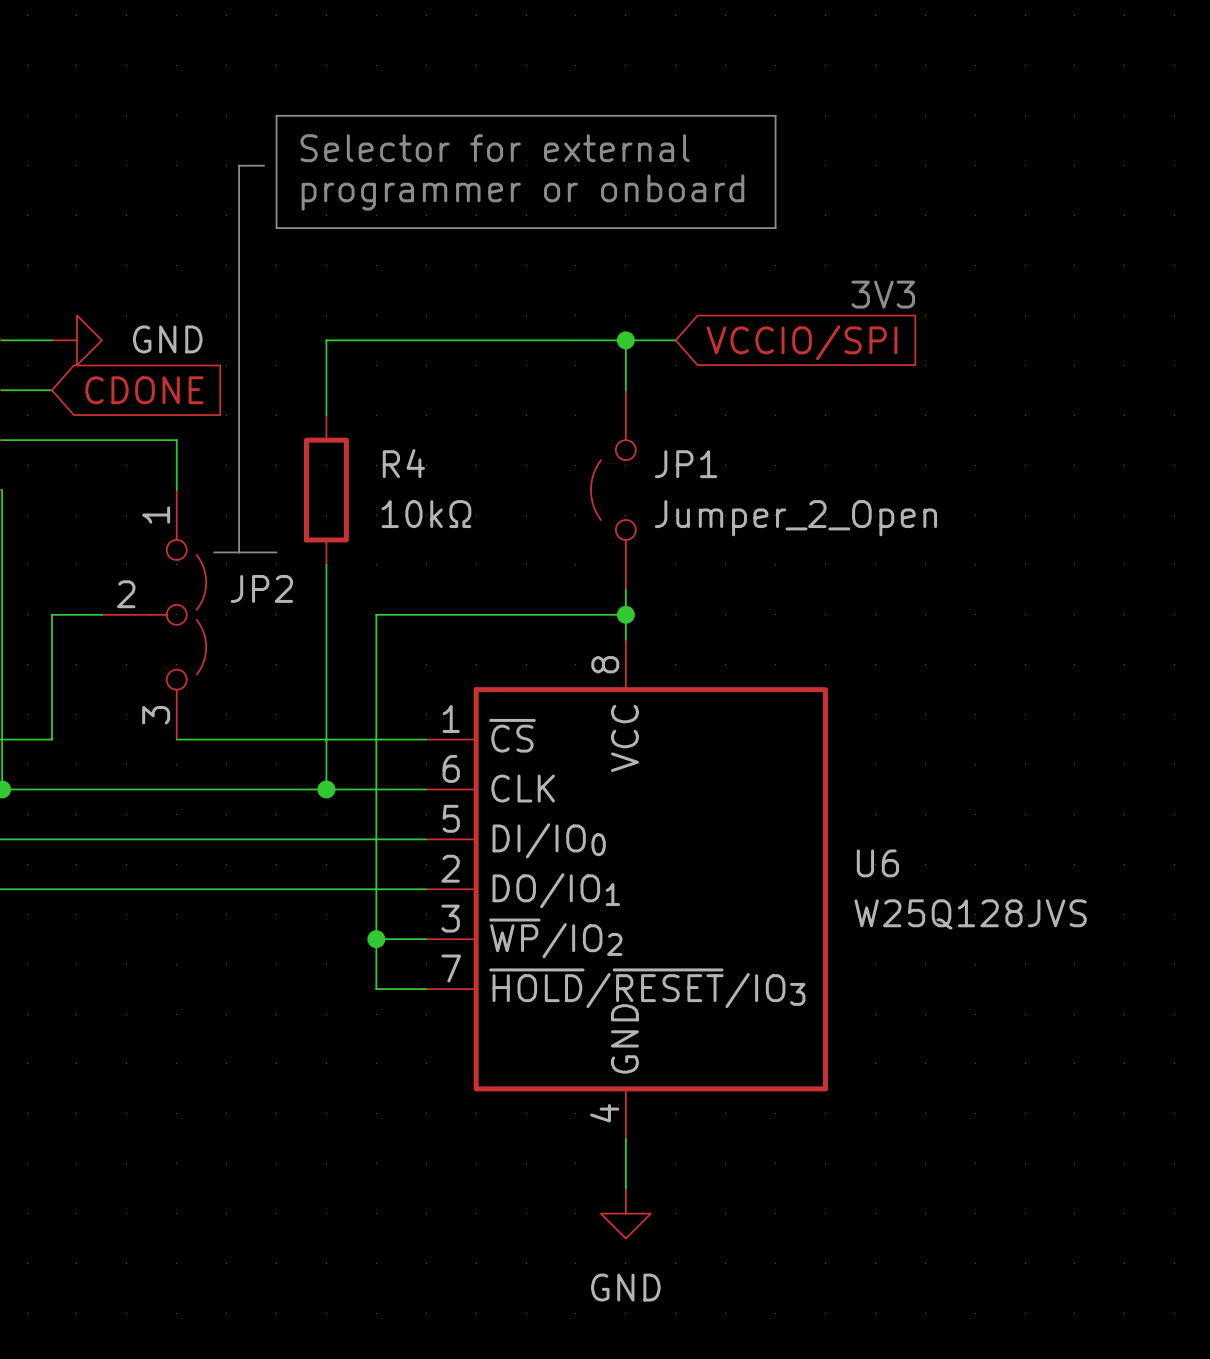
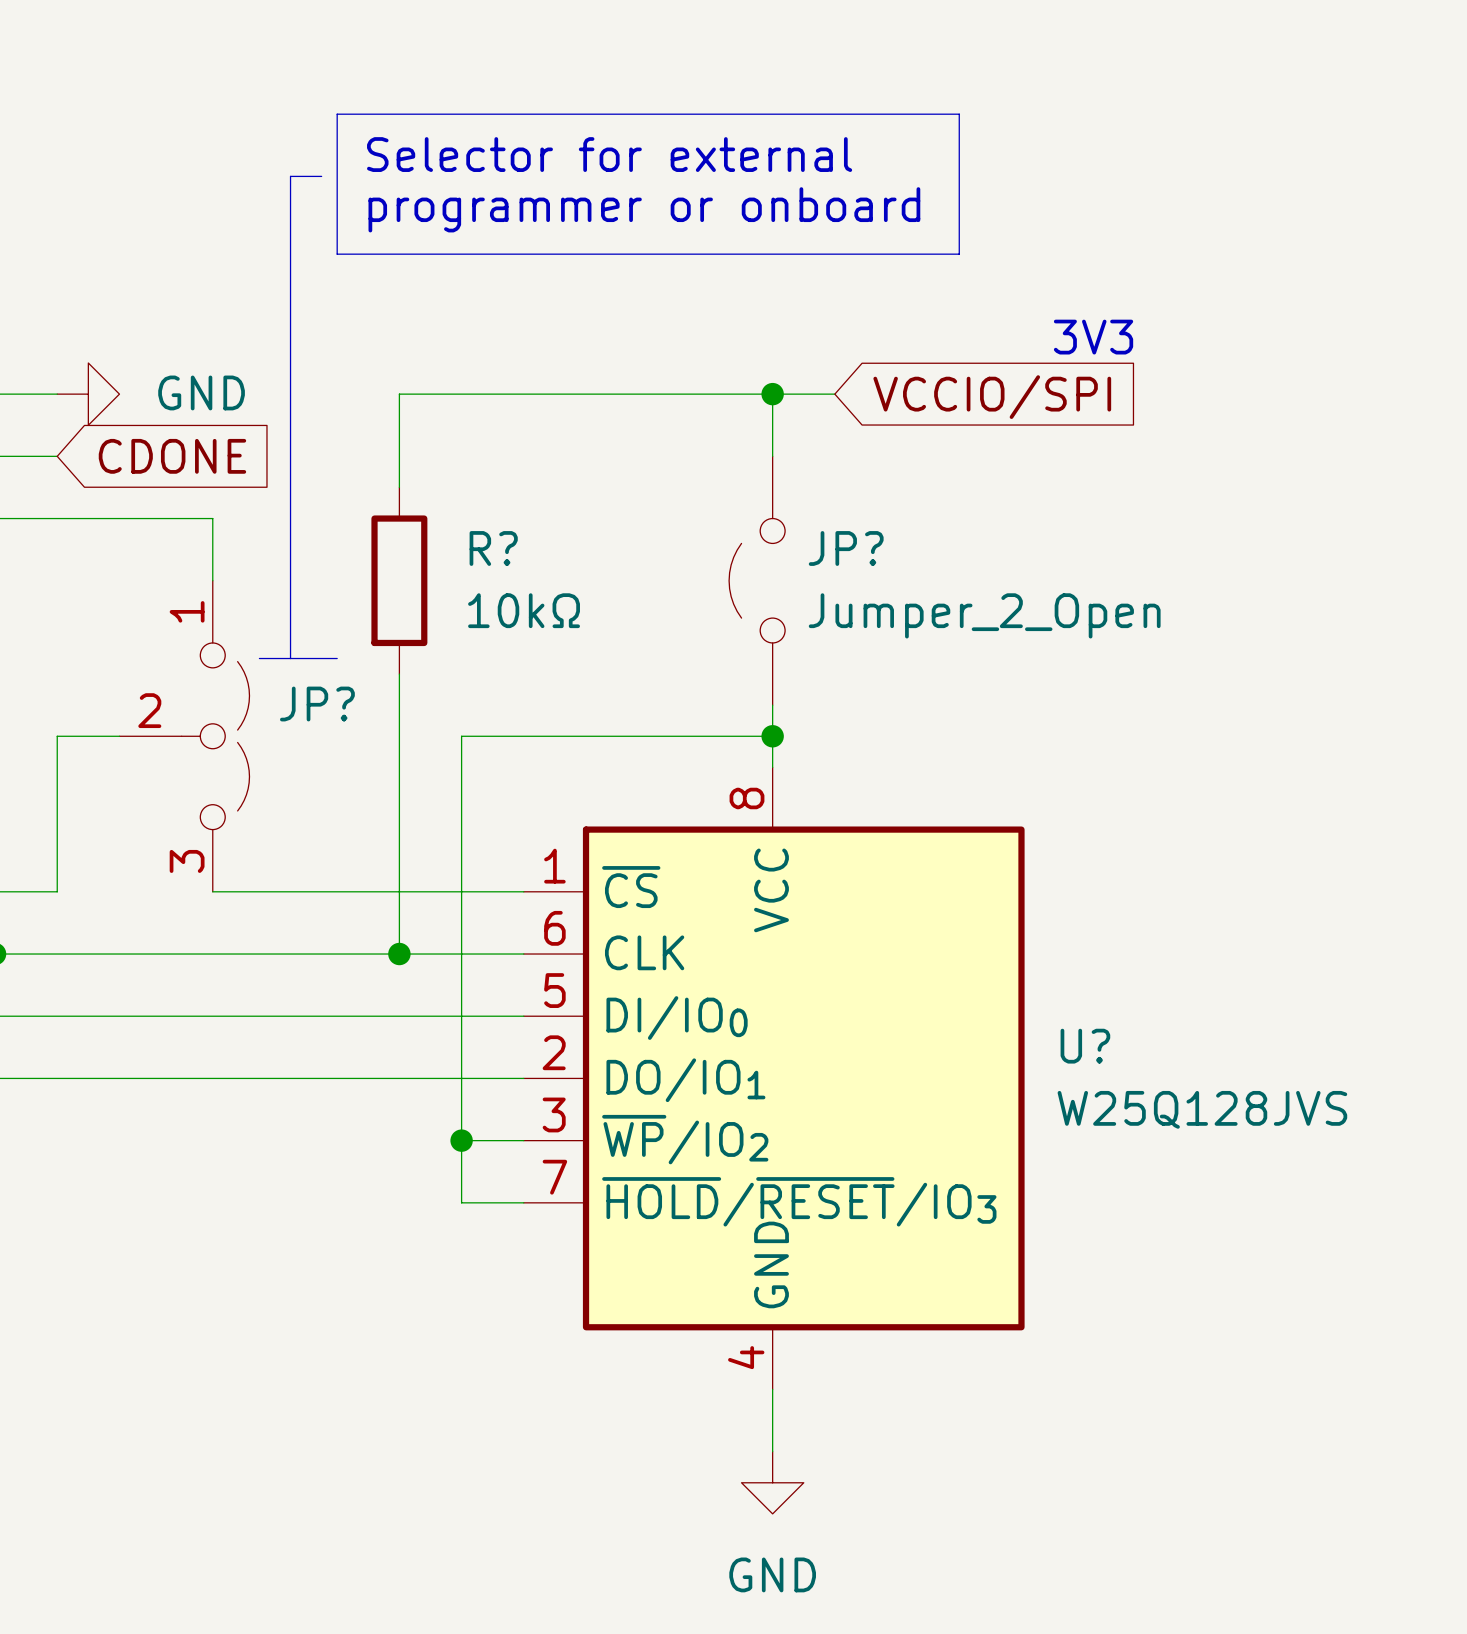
R4 name: R4 (403, 463) -> R? (493, 548)
JP1 name: JP1 (686, 464) -> JP? (846, 548)
JP2 name: JP2 (261, 588) -> JP? (317, 704)
U6 name: U6 (877, 863) -> U? (1085, 1046)

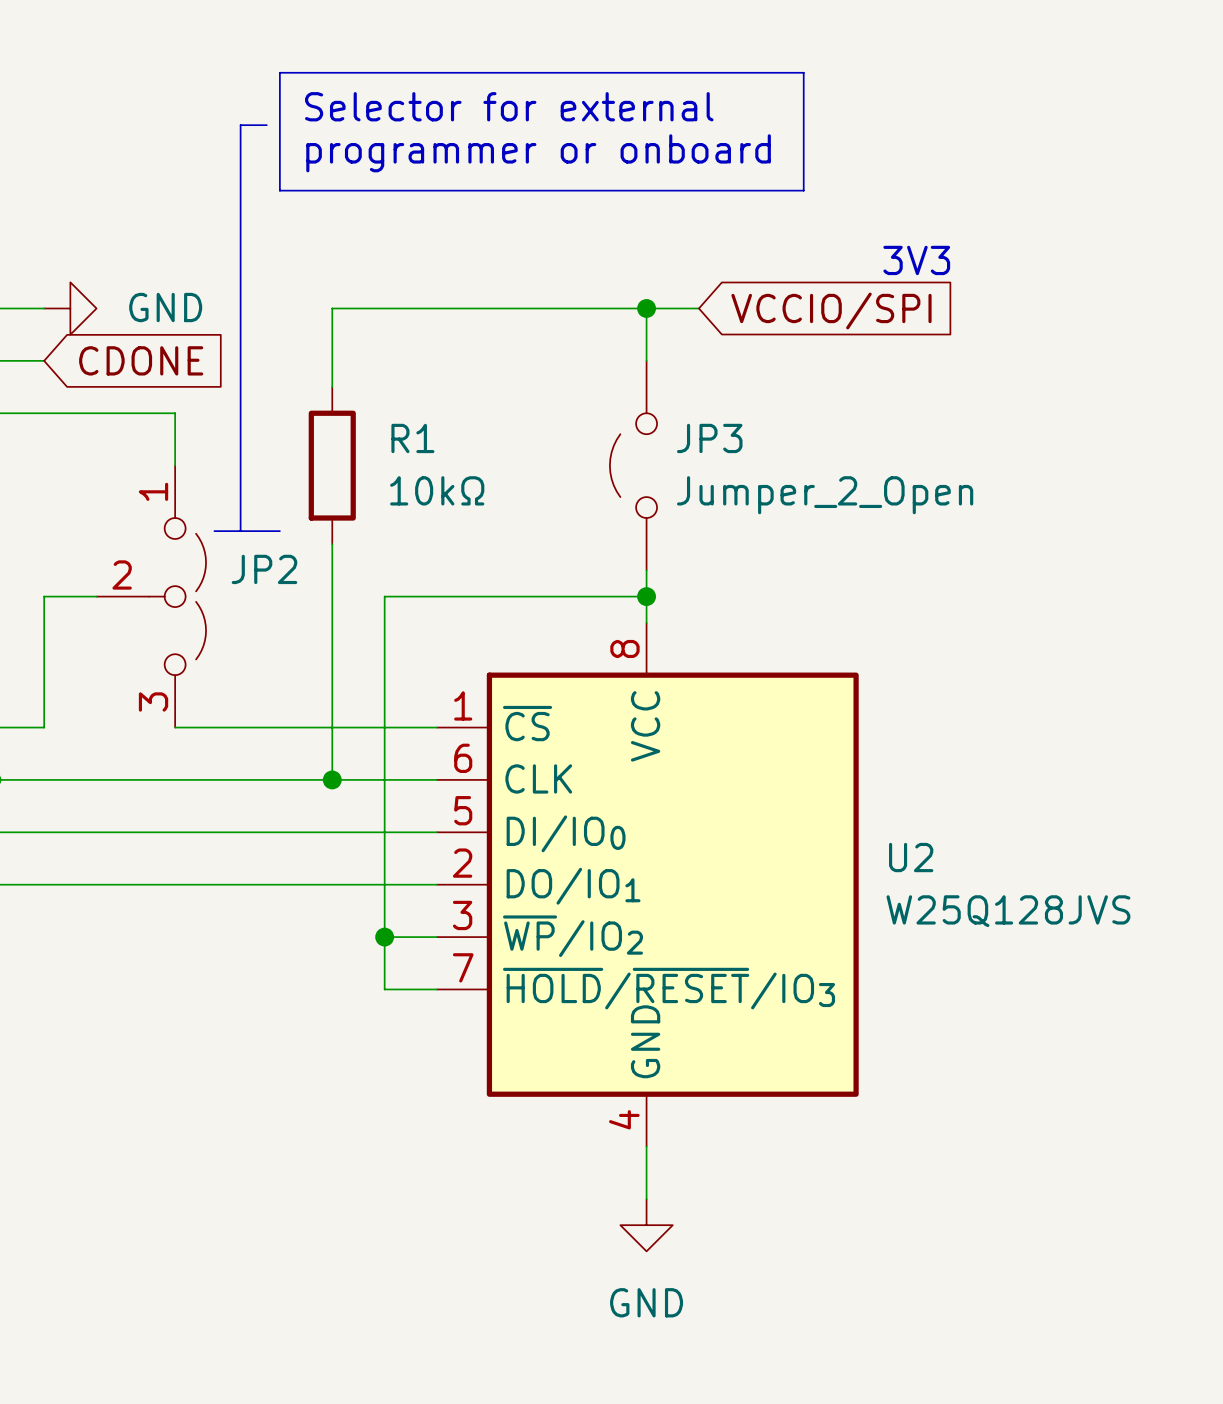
R? name: R? (493, 548) -> R1 (412, 438)
JP? name: JP? (846, 548) -> JP3 (709, 438)
JP? name: JP? (317, 704) -> JP2 (264, 569)
U? name: U? (1085, 1046) -> U2 (911, 857)

